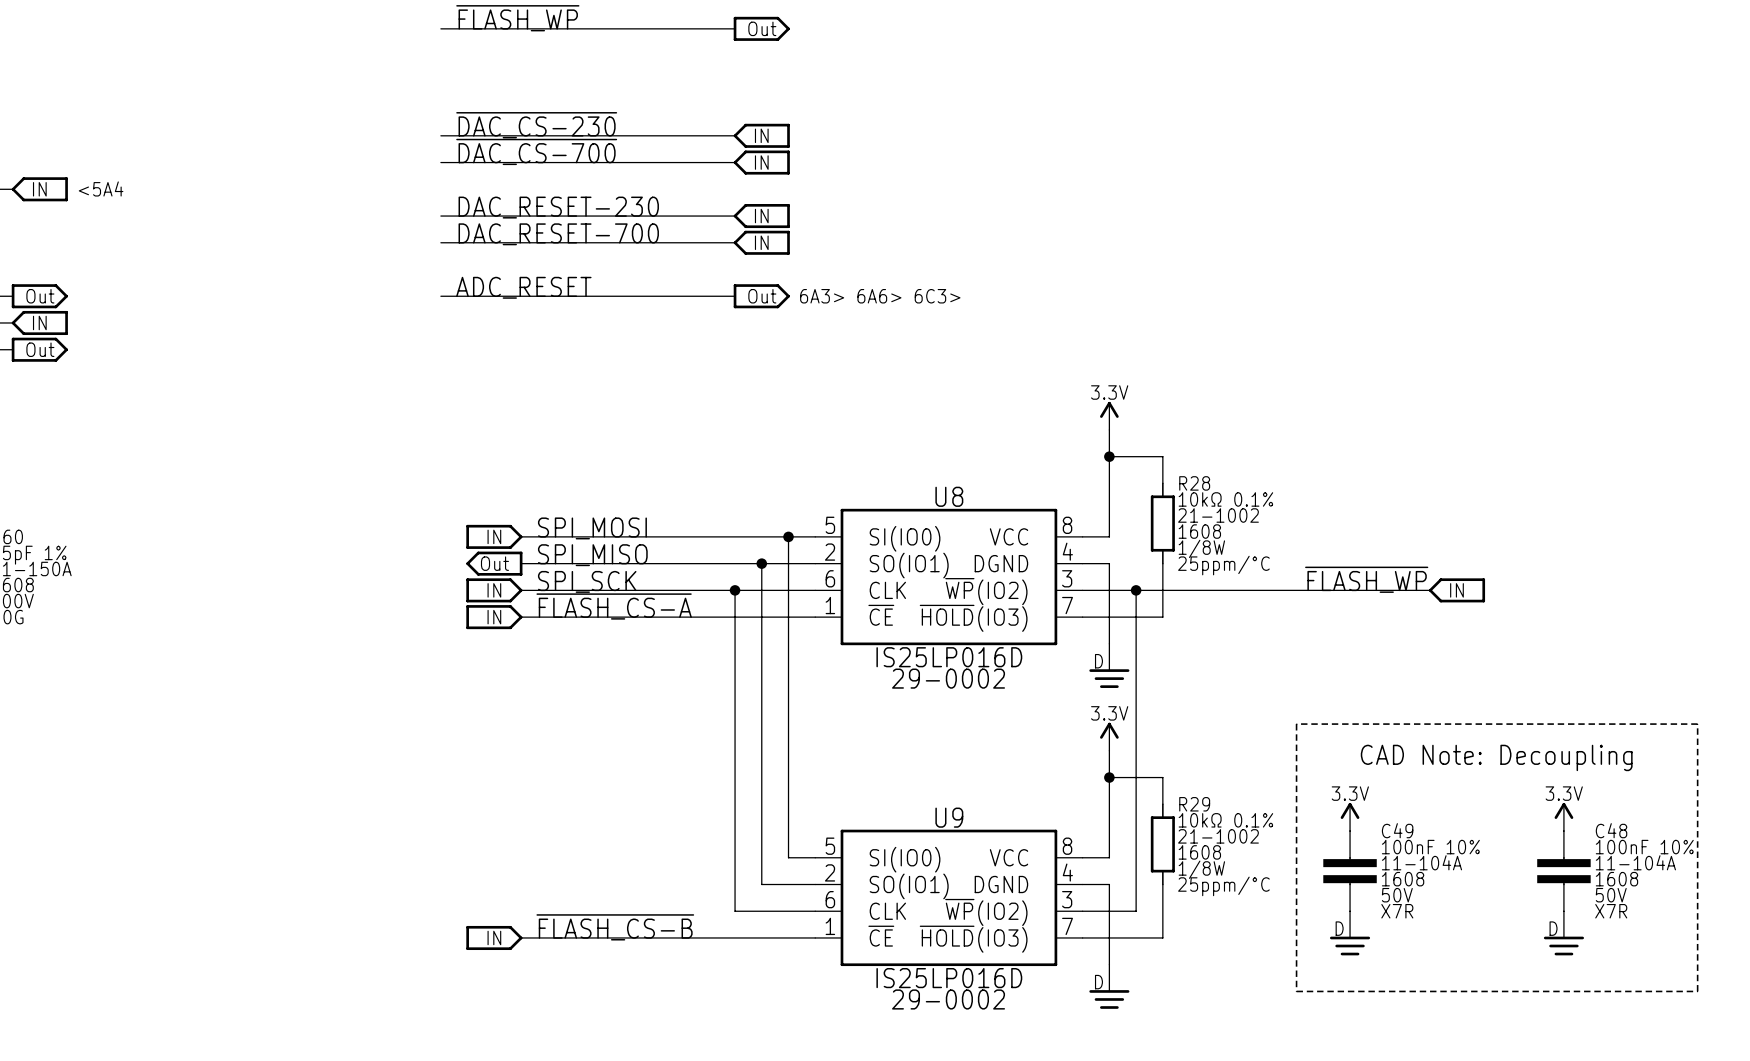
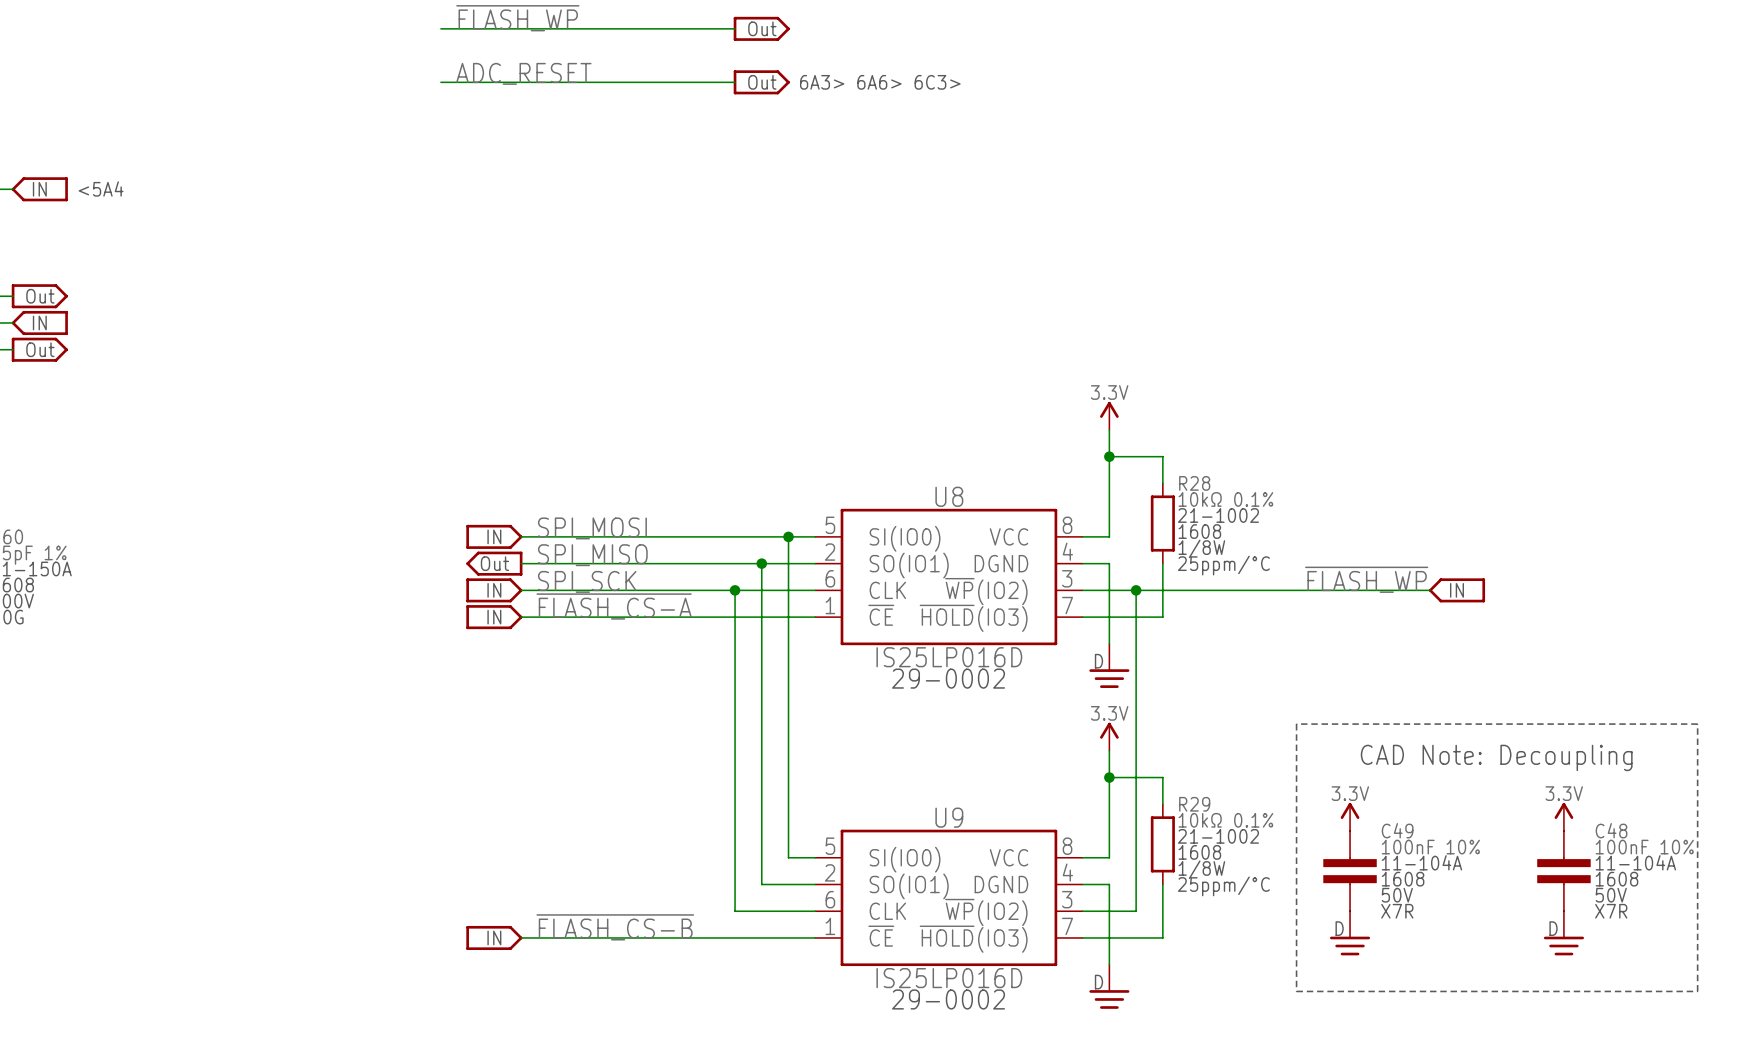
label: ~{DAC_CS-230} (536, 125) -> none
wire: (440, 135) (735, 135) -> (440, 82) (735, 82)
part: (761, 135) -> none
label: ~{DAC_CS-700} (536, 151) -> none
wire: (440, 162) (735, 162) -> none
part: (761, 162) -> none
label: DAC_RESET-230 (558, 207) -> none
wire: (440, 216) (735, 216) -> none
part: (761, 216) -> none
label: DAC_RESET-700 (558, 234) -> none
wire: (440, 242) (735, 242) -> none
part: (761, 242) -> none
label position: ADC_RESET (523, 287) -> ADC_RESET (523, 73)
wire: (440, 296) (735, 296) -> none
part position: (761, 296) -> (761, 82)
text position: 6A3> 6A6> 6C3> (880, 296) -> 6A3> 6A6> 6C3> (880, 82)

